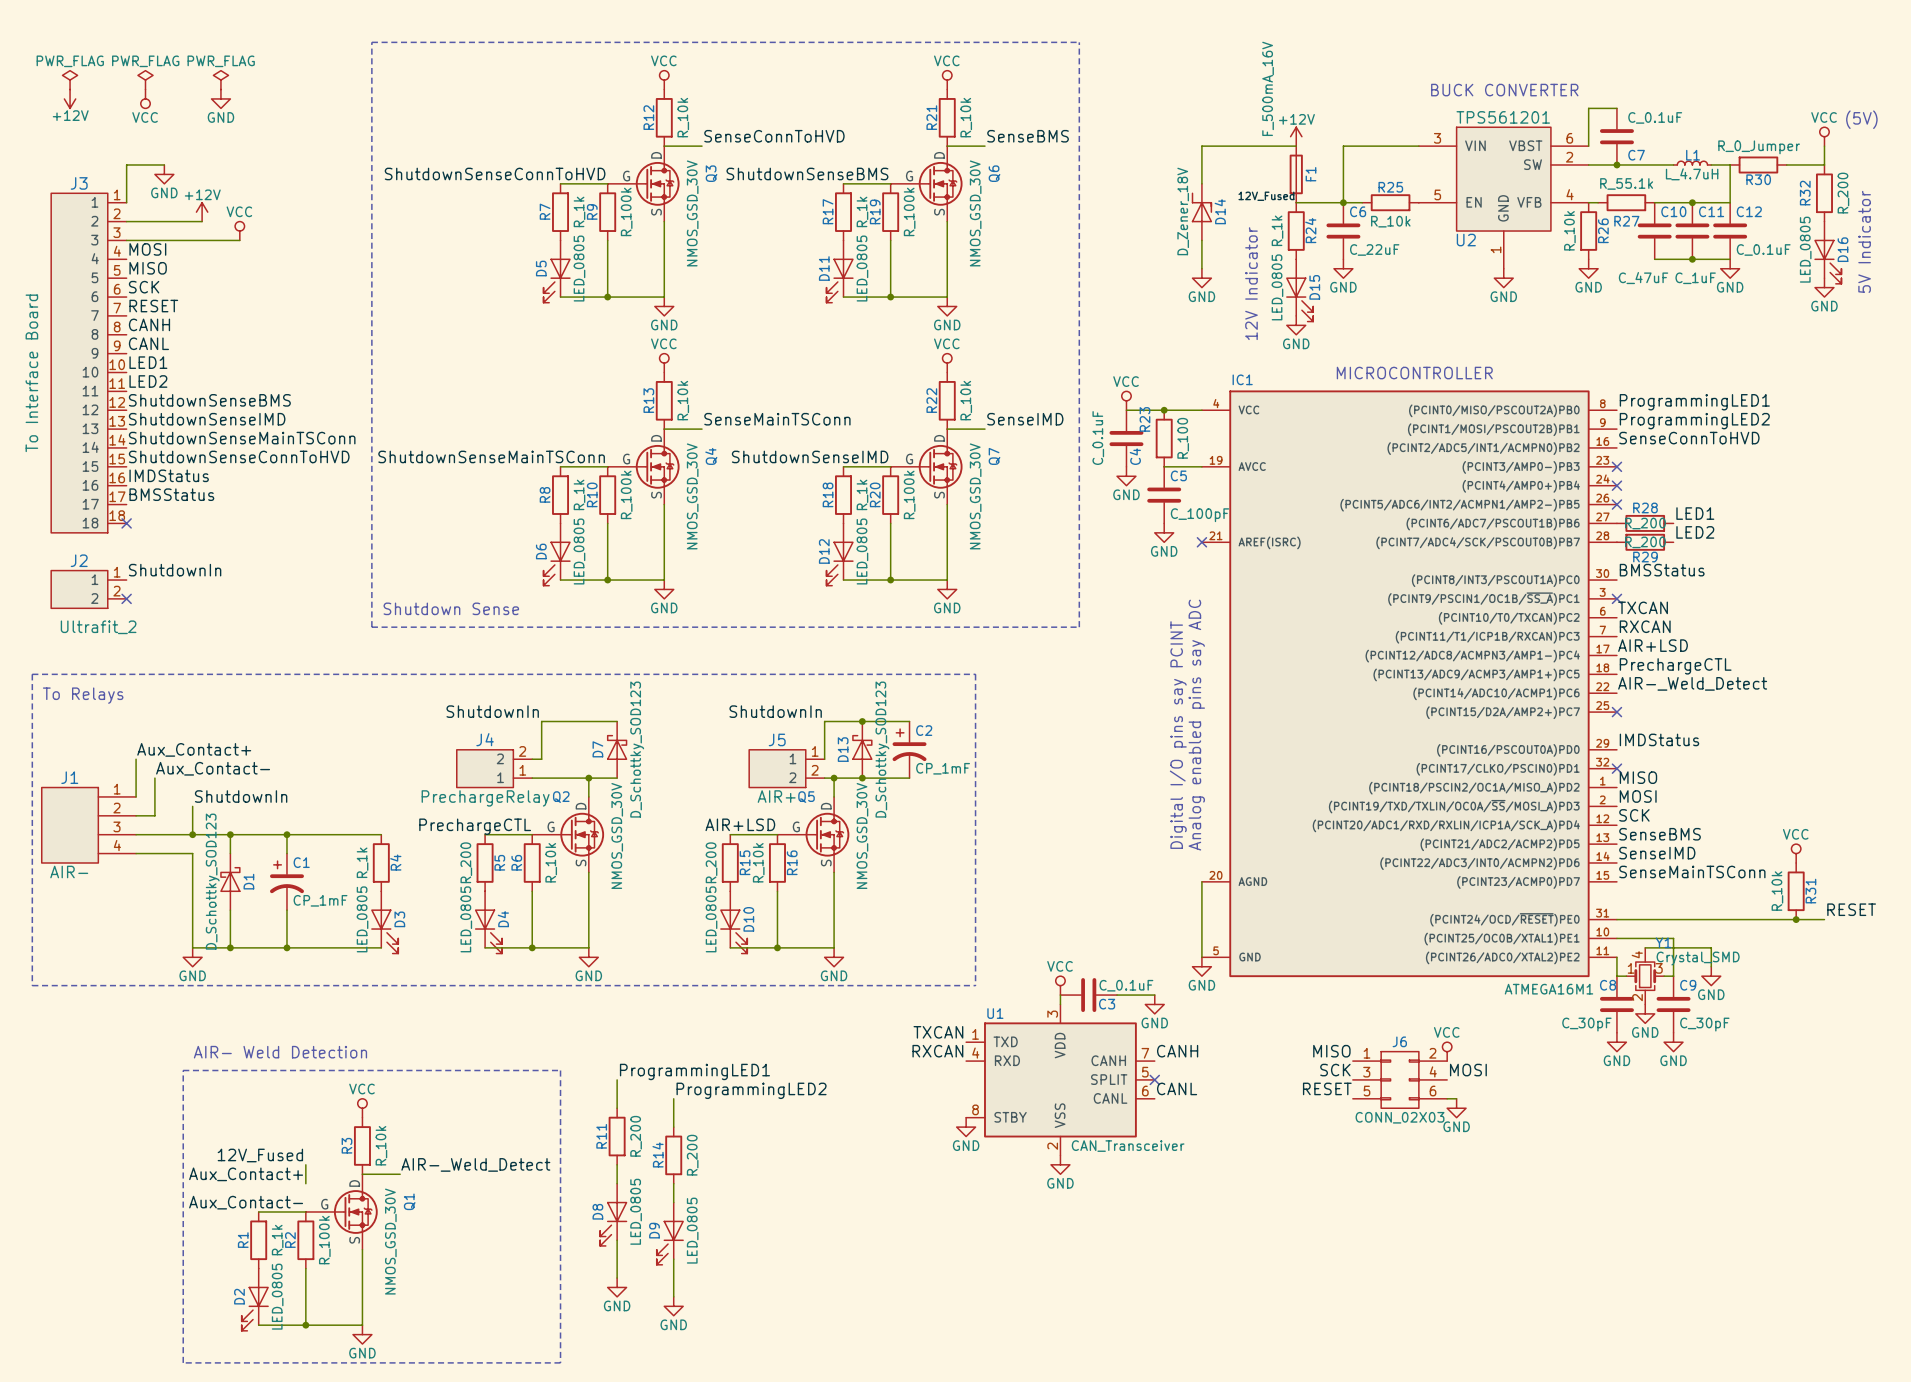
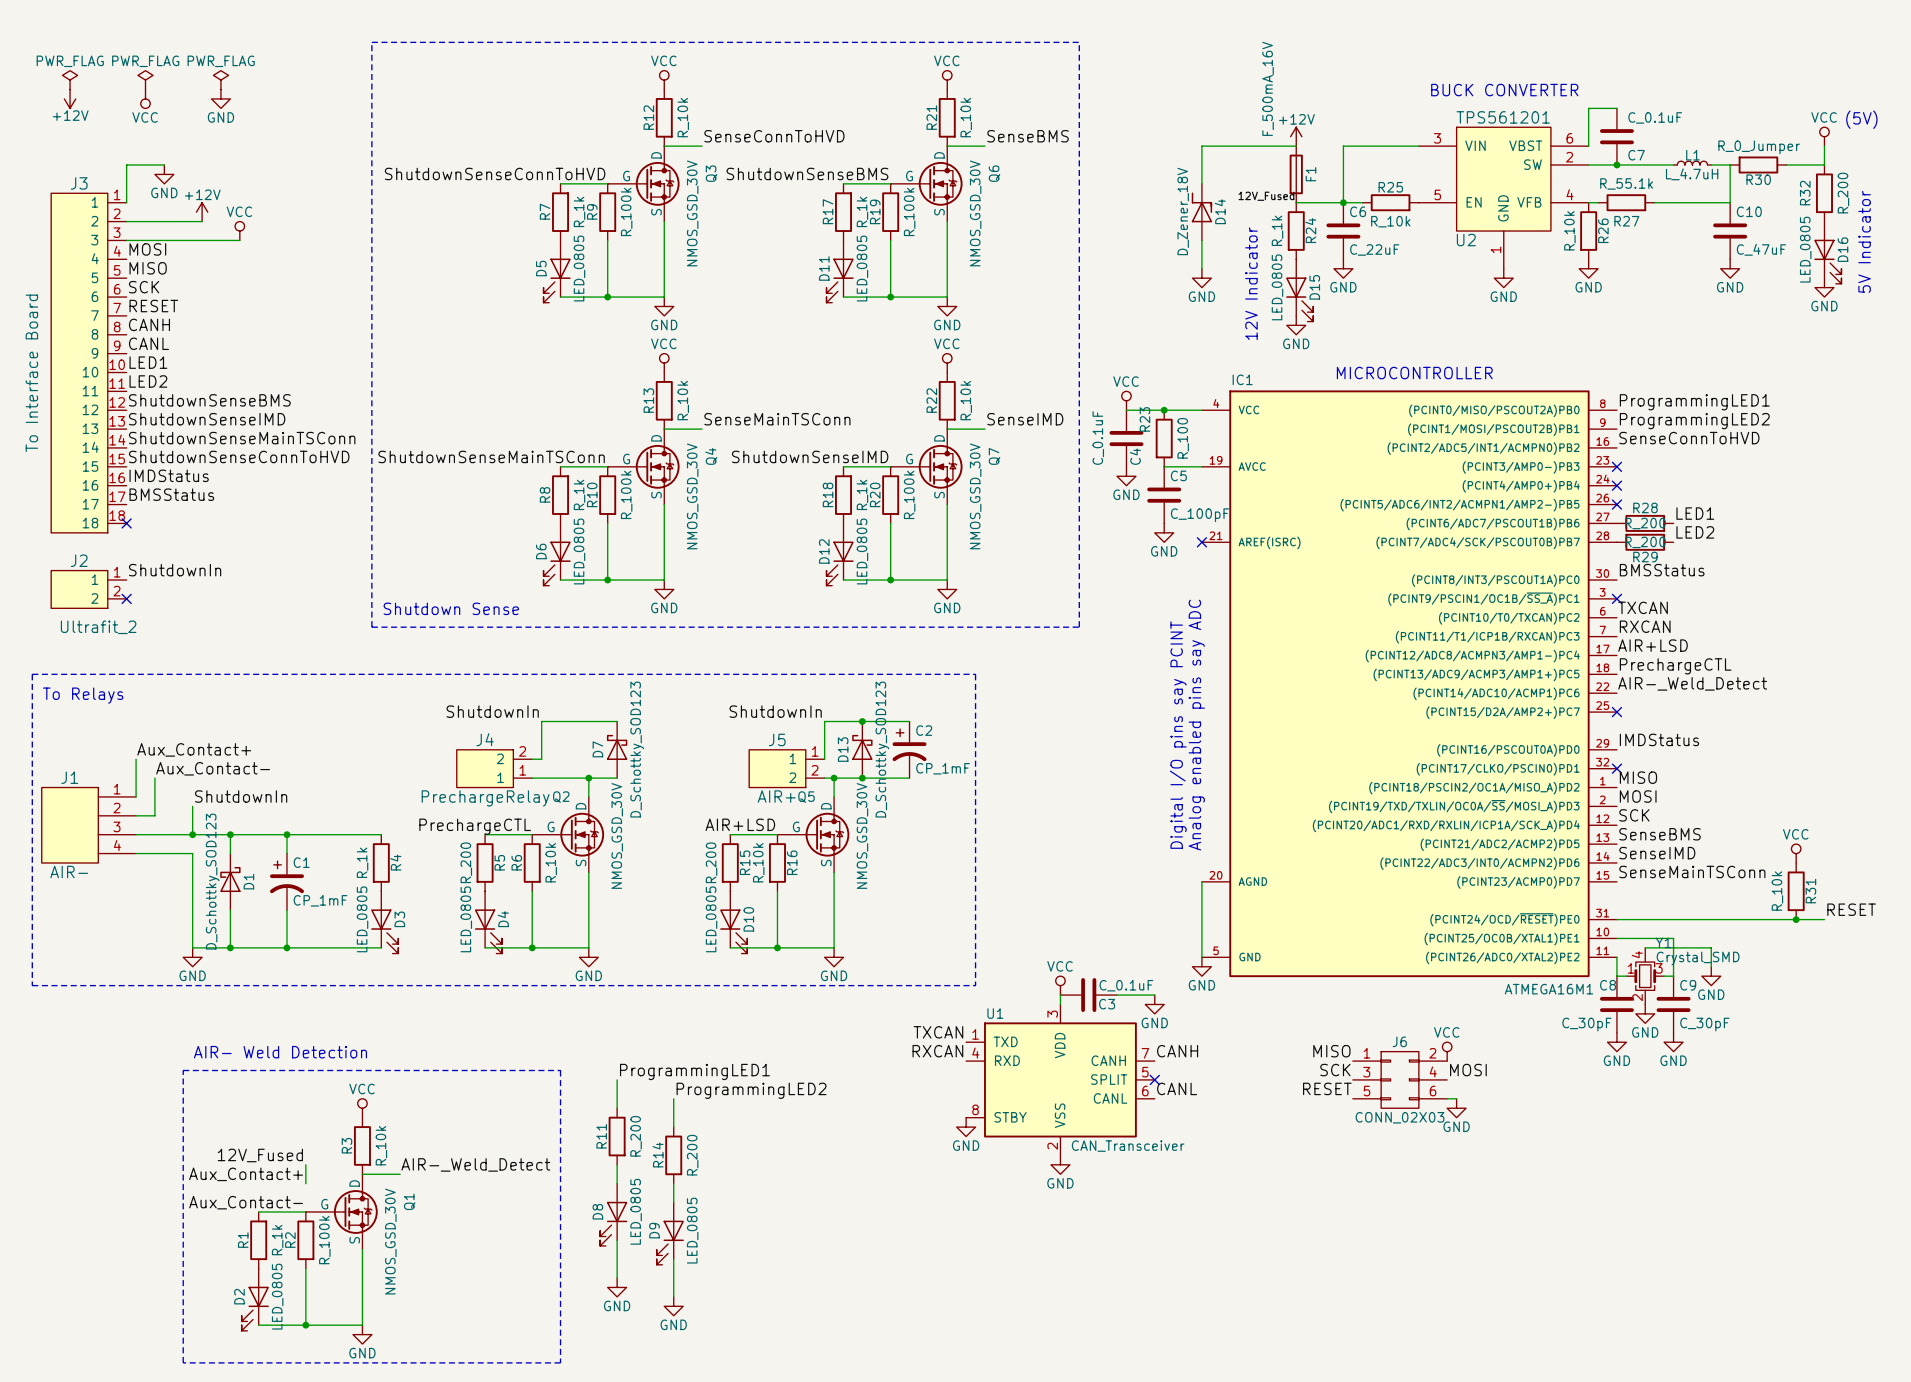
junction: (1692, 202) -> none
C12 name: C12 (1749, 211) -> C10 (1749, 211)
C10: C_47uF (1654, 231) -> none
C11: C_1uF (1692, 231) -> none
C12 value: C_0.1uF (1763, 249) -> C_47uF (1761, 249)
wire: (1654, 259) (1730, 259) -> none
junction: (1692, 259) -> none

